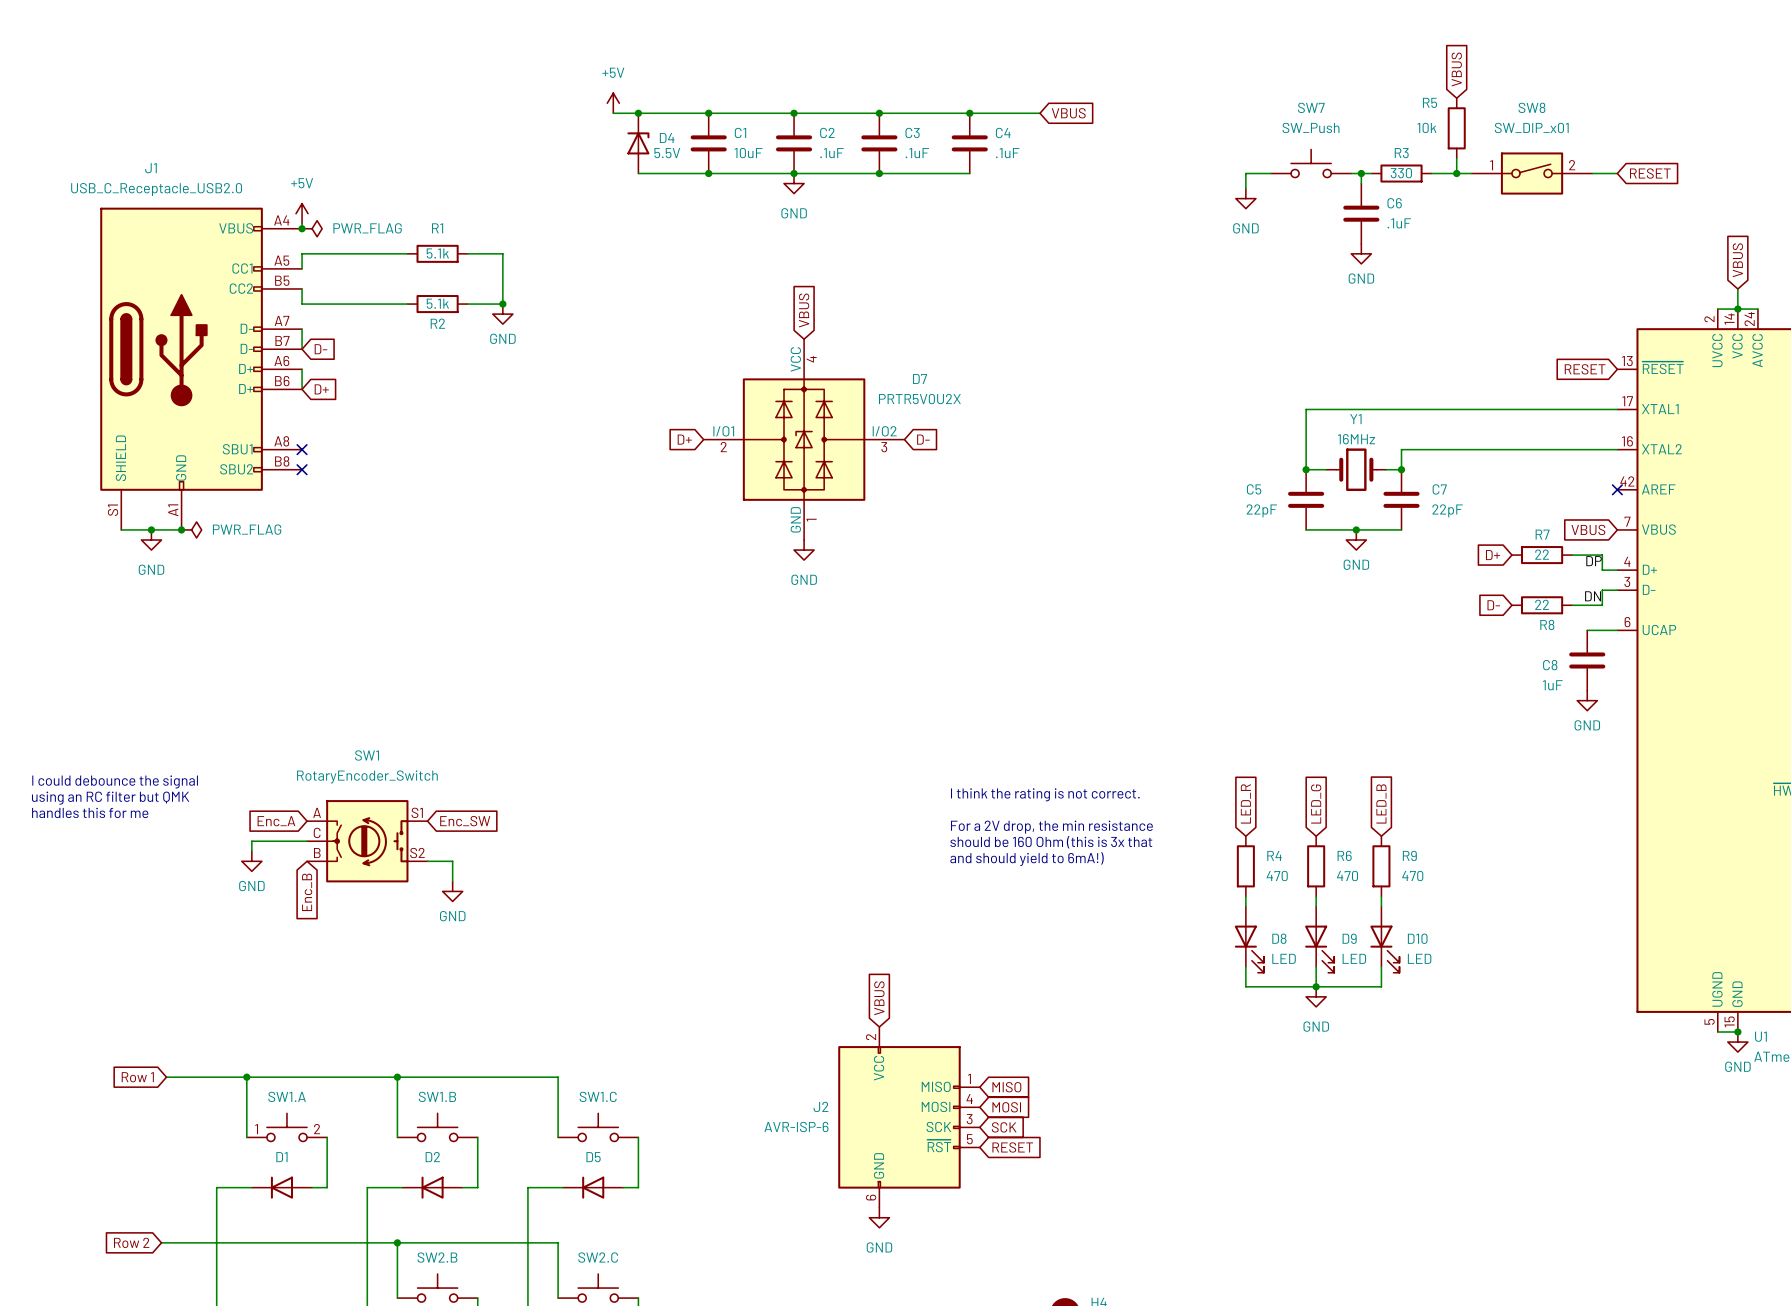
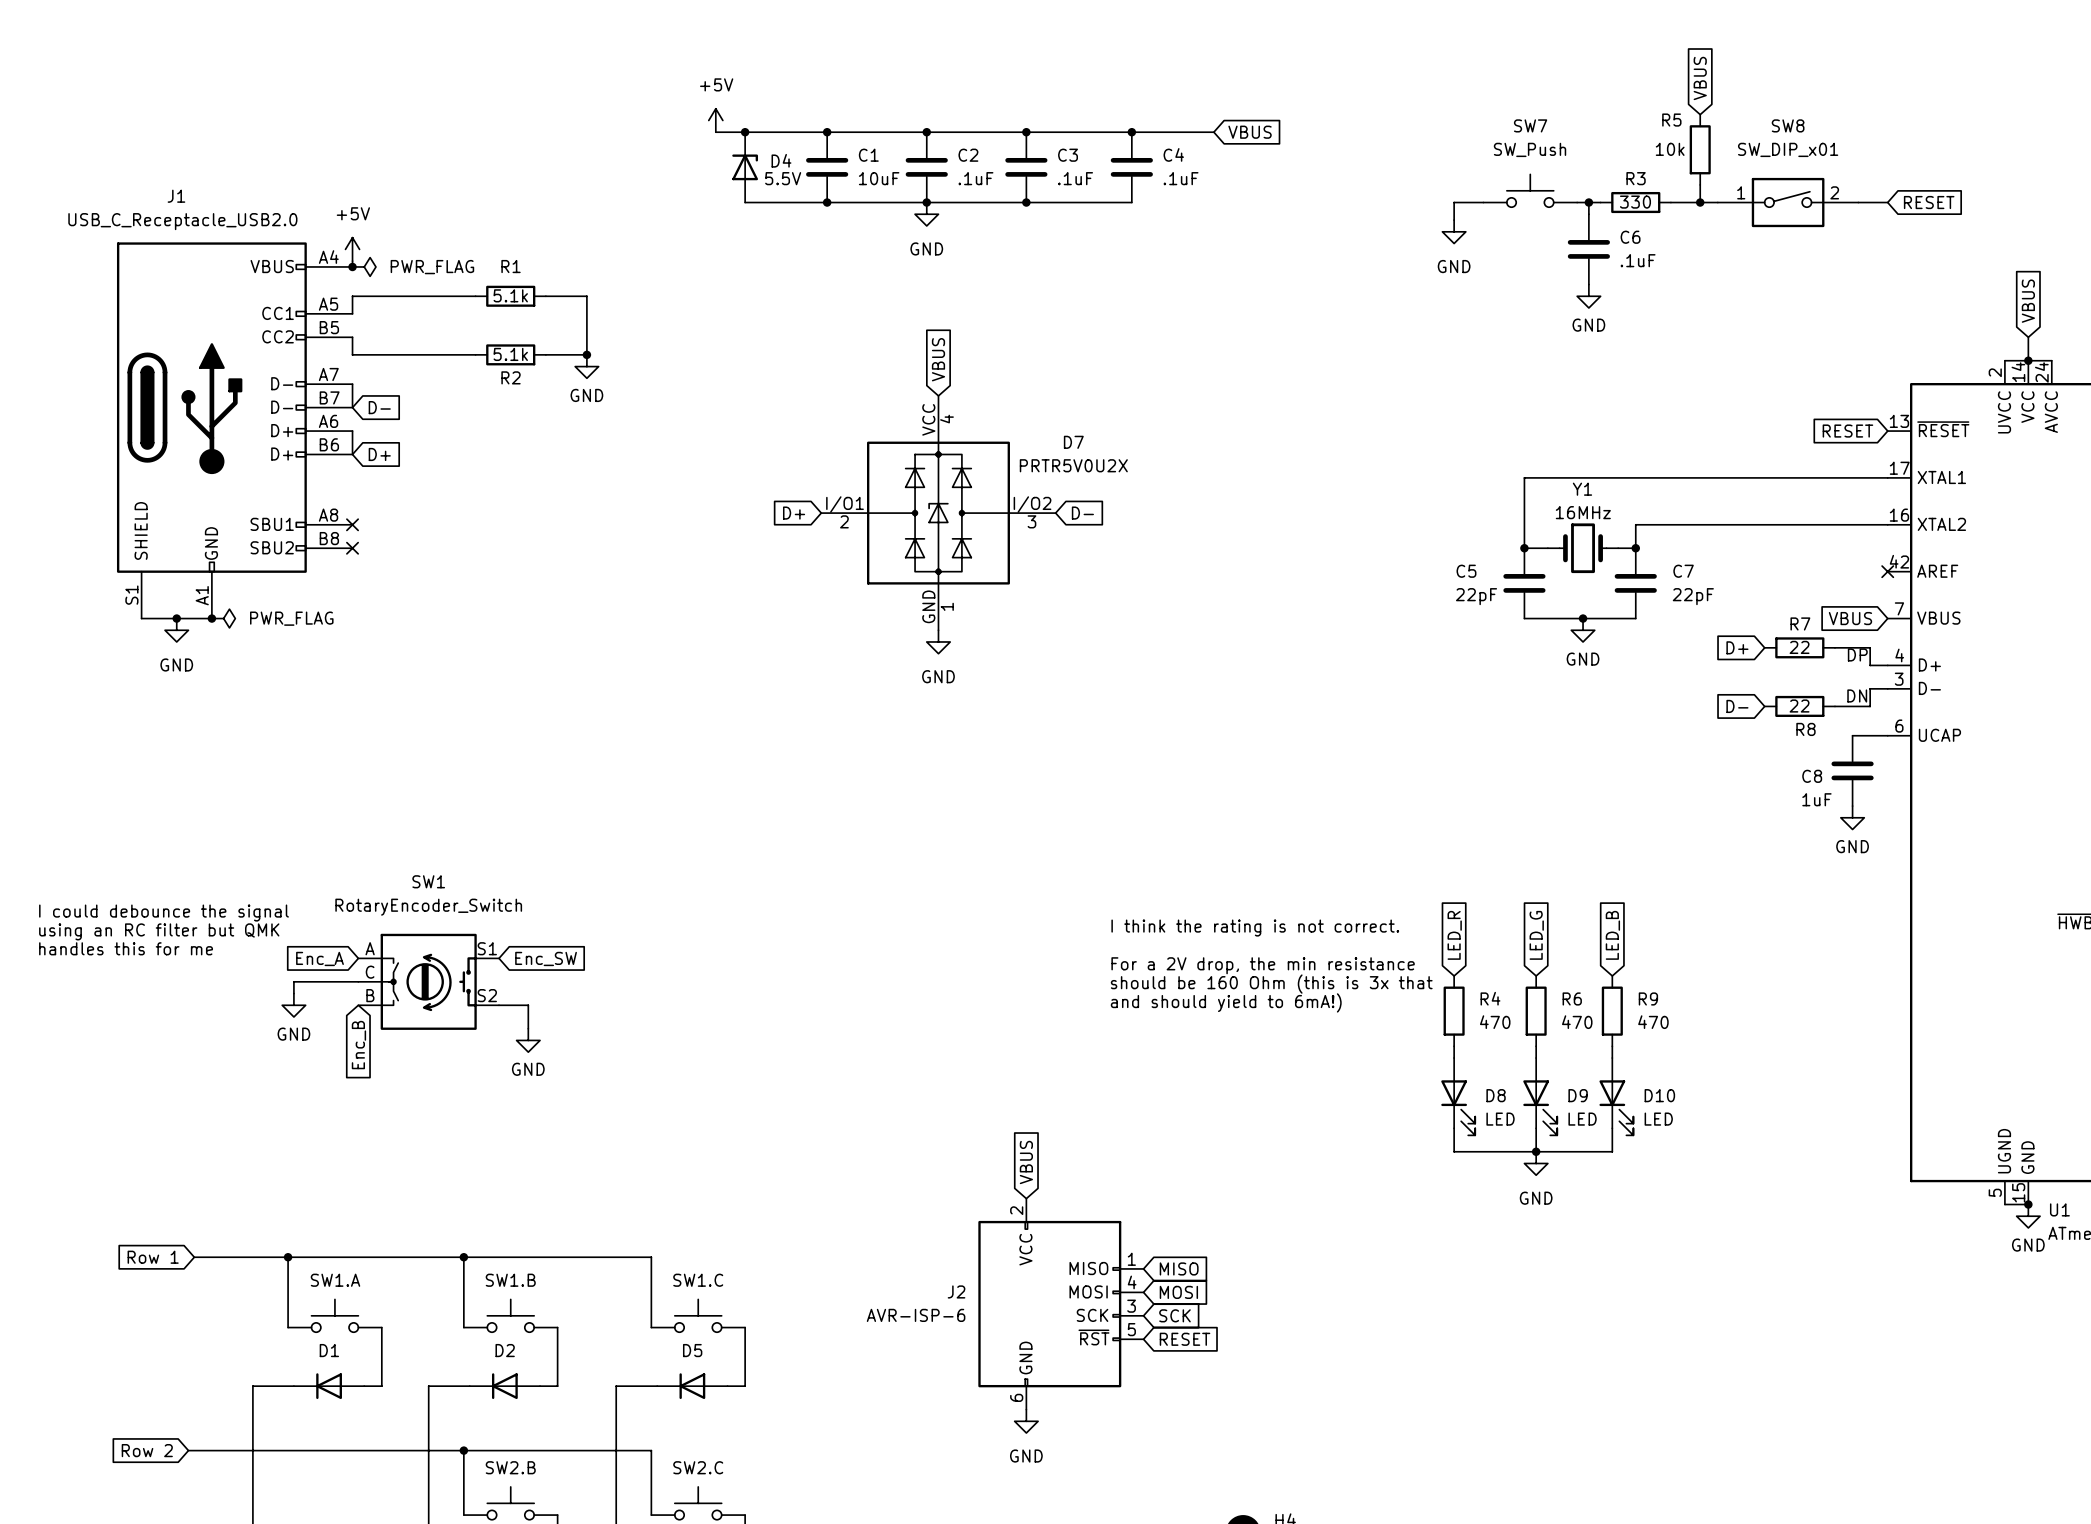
part pin number: 1 (256, 1129) -> none
part pin number: 2 (317, 1129) -> none

